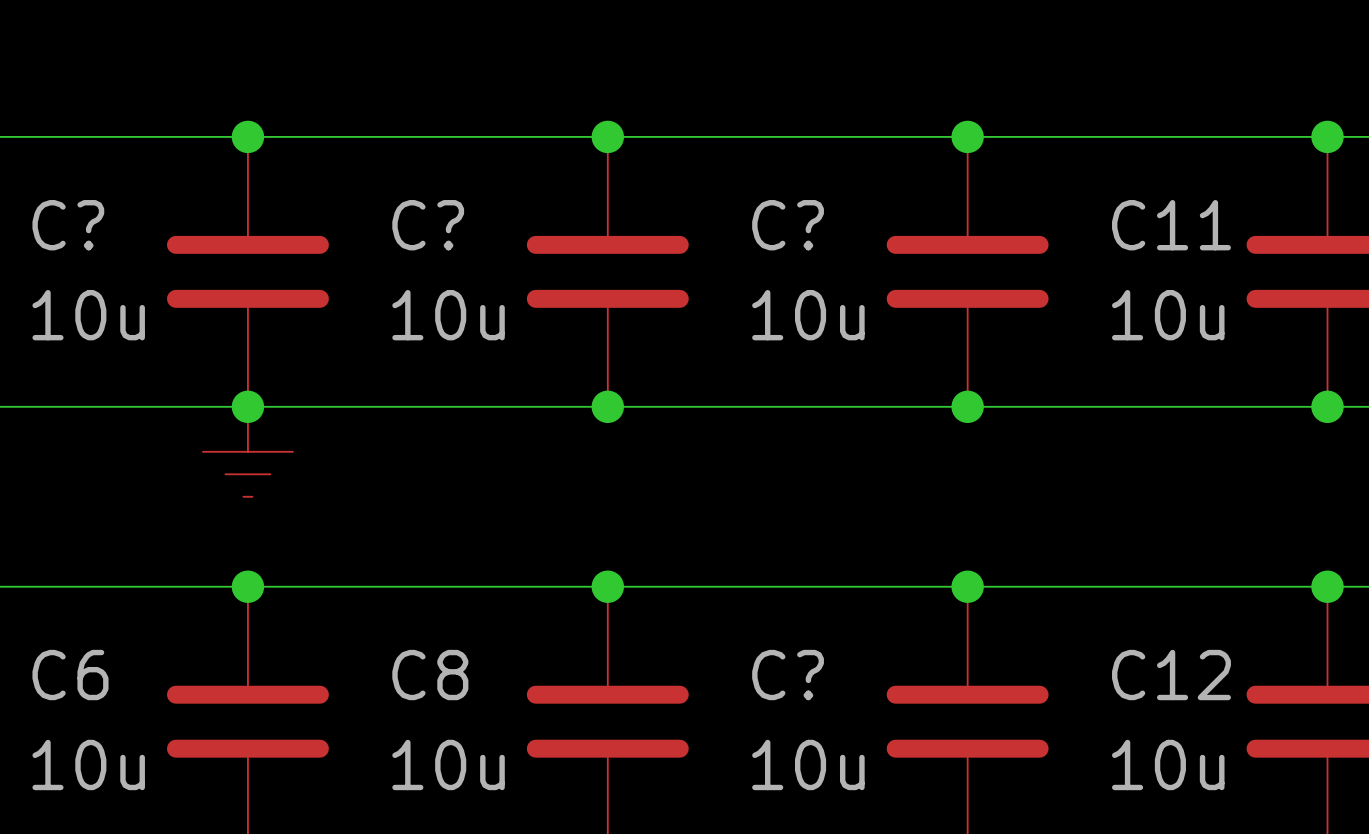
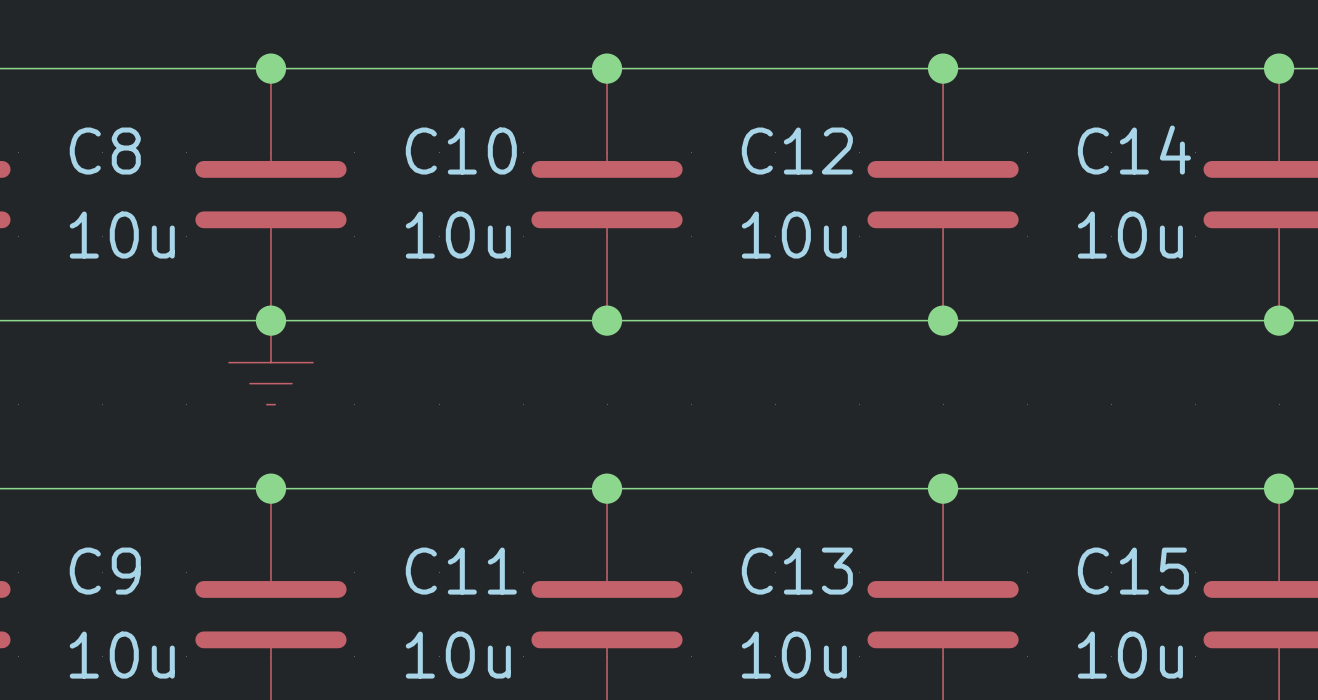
C? name: C? (68, 225) -> C8 (105, 151)
C? name: C? (428, 225) -> C10 (461, 151)
C? name: C? (788, 225) -> C12 (797, 151)
C11 name: C11 (1171, 225) -> C14 (1134, 150)
C6 name: C6 (70, 675) -> C9 (105, 571)
C8 name: C8 (430, 675) -> C11 (461, 571)
C? name: C? (788, 675) -> C13 (797, 571)
C12 name: C12 (1171, 675) -> C15 (1133, 571)

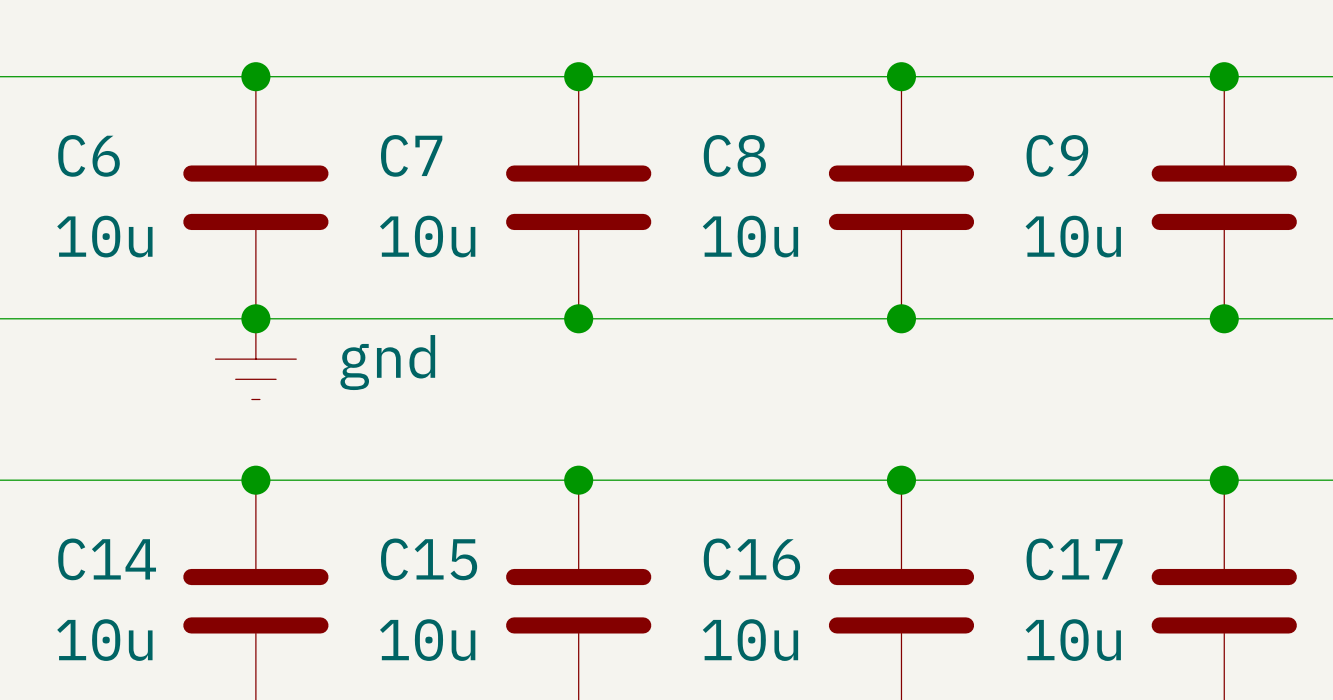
C14 name: C14 (1134, 150) -> C9 (1057, 155)
C8 name: C8 (105, 151) -> C6 (89, 155)
C10 name: C10 (461, 151) -> C7 (411, 155)
C12 name: C12 (797, 151) -> C8 (734, 155)
power symbol text: none -> gnd (387, 362)
C9 name: C9 (105, 571) -> C14 (107, 559)
C11 name: C11 (461, 571) -> C15 (429, 559)
C13 name: C13 (797, 571) -> C16 (751, 559)
C15 name: C15 (1133, 571) -> C17 (1074, 559)

